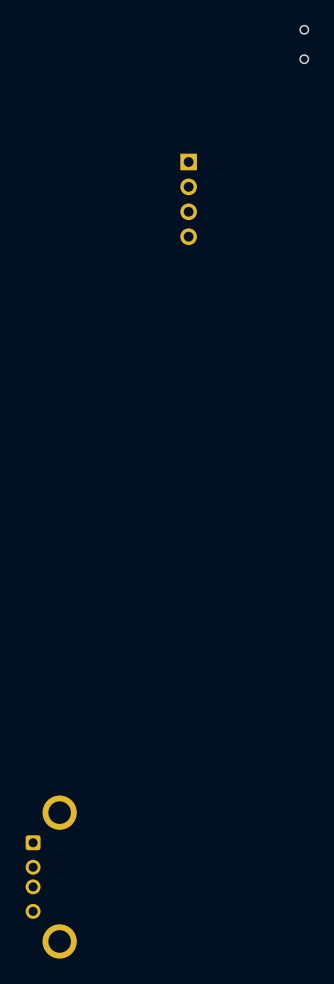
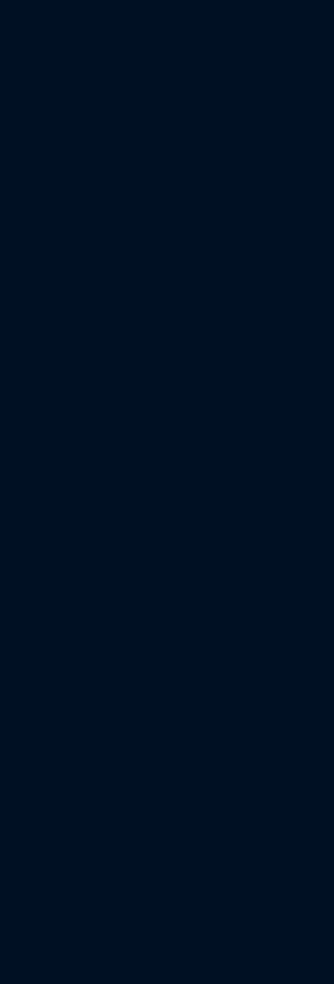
part: (304, 44) -> none
part: (188, 199) -> none
part: (51, 877) -> none

